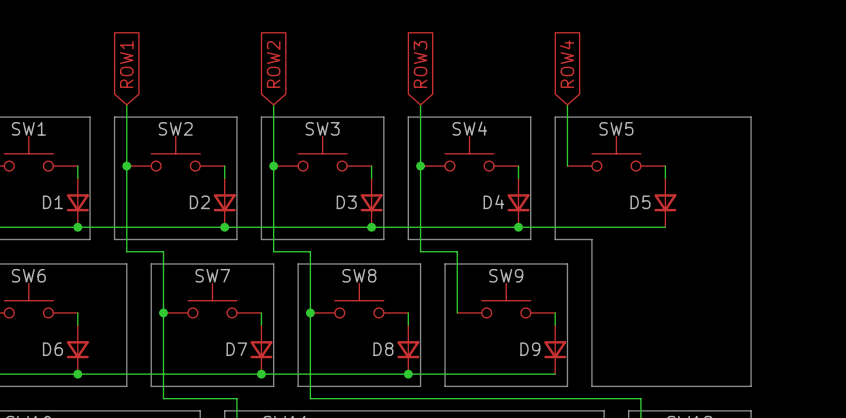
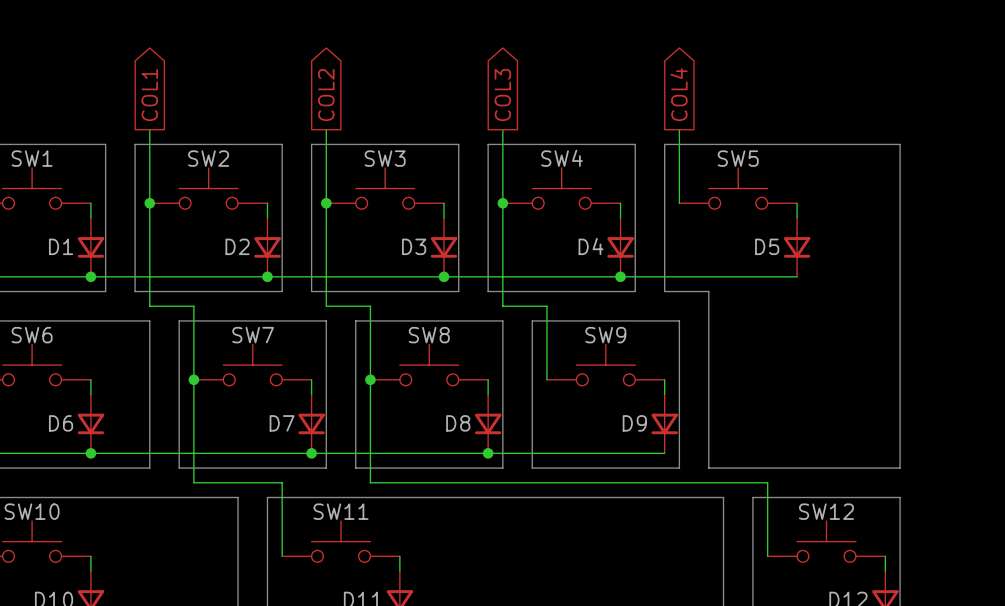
global label shape: input (126, 64) -> output (149, 95)
global label: ROW1 (126, 64) -> COL1 (149, 95)
global label shape: input (273, 64) -> output (326, 95)
global label: ROW2 (273, 64) -> COL2 (326, 95)
global label shape: input (420, 64) -> output (502, 95)
global label: ROW3 (420, 64) -> COL3 (502, 95)
global label shape: input (567, 64) -> output (679, 94)
global label: ROW4 (567, 64) -> COL4 (679, 94)

